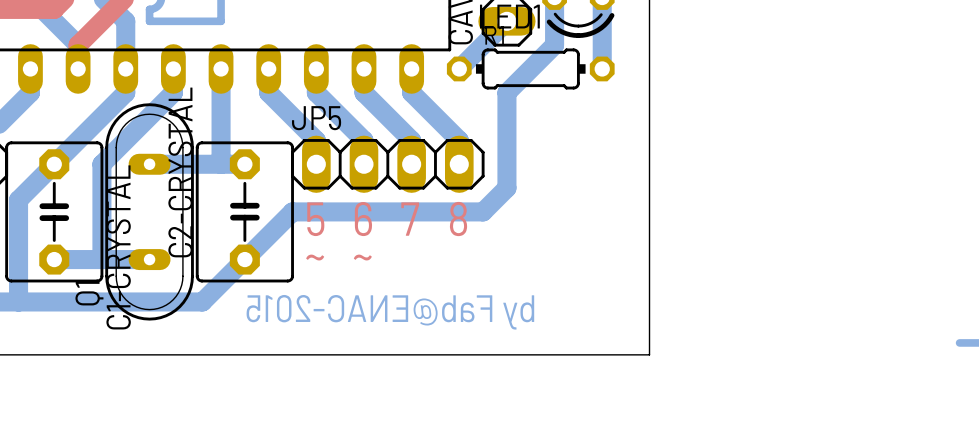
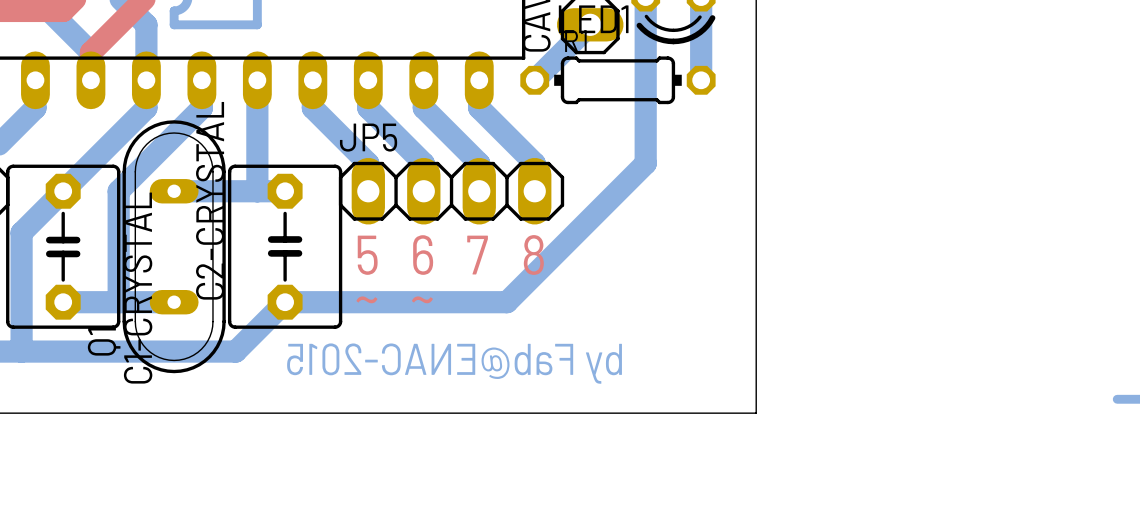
bottom track: (554, 45) (506, 92) (506, 188) -> (645, 52) (645, 163) (590, 218)
bottom track: (483, 211) (292, 211) (244, 259) -> (562, 246) (507, 302) (285, 302)

